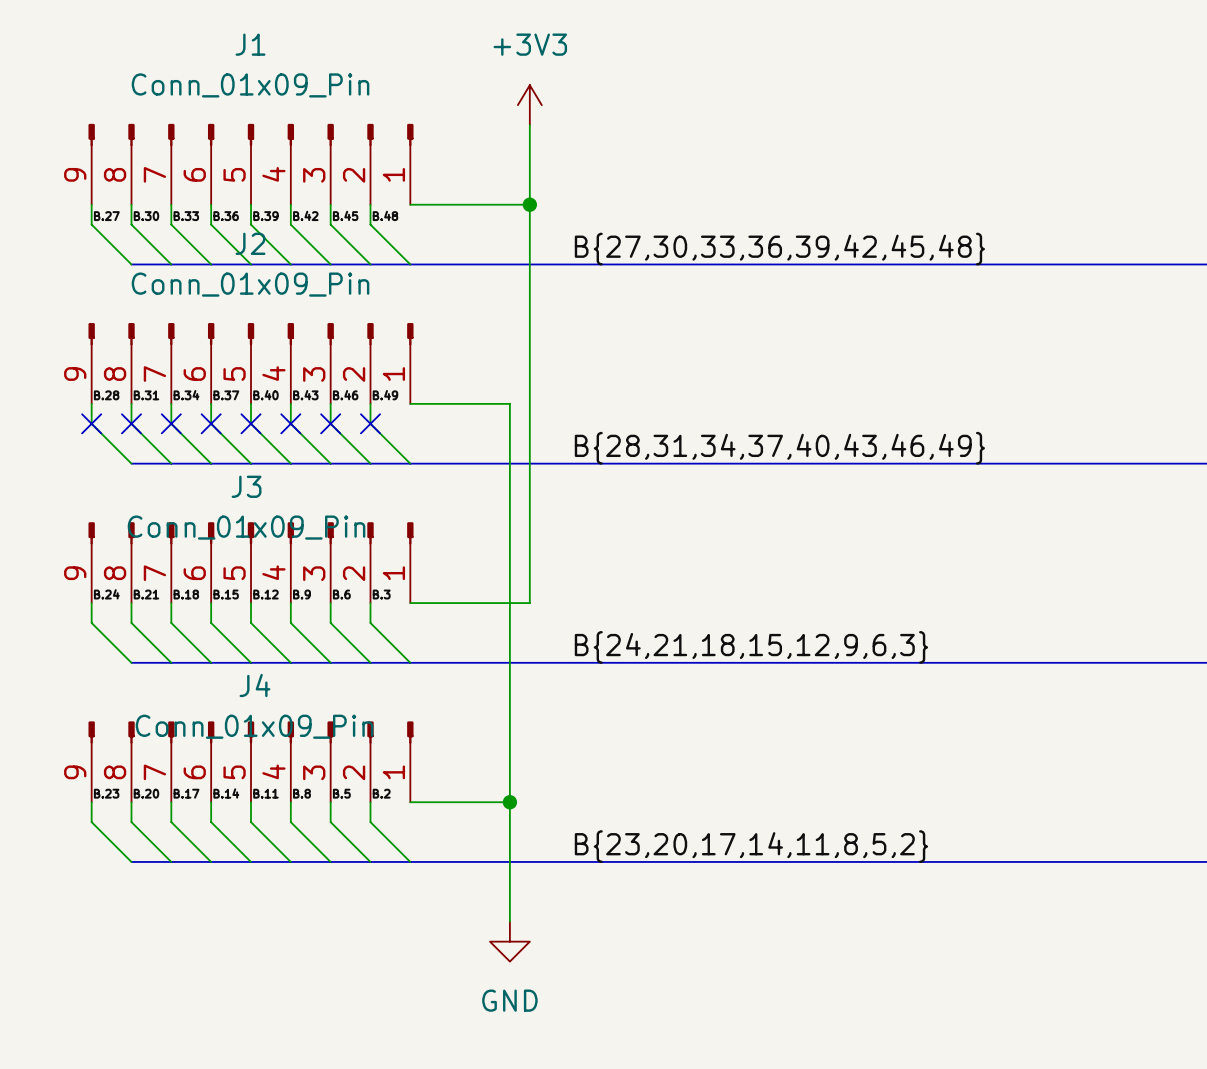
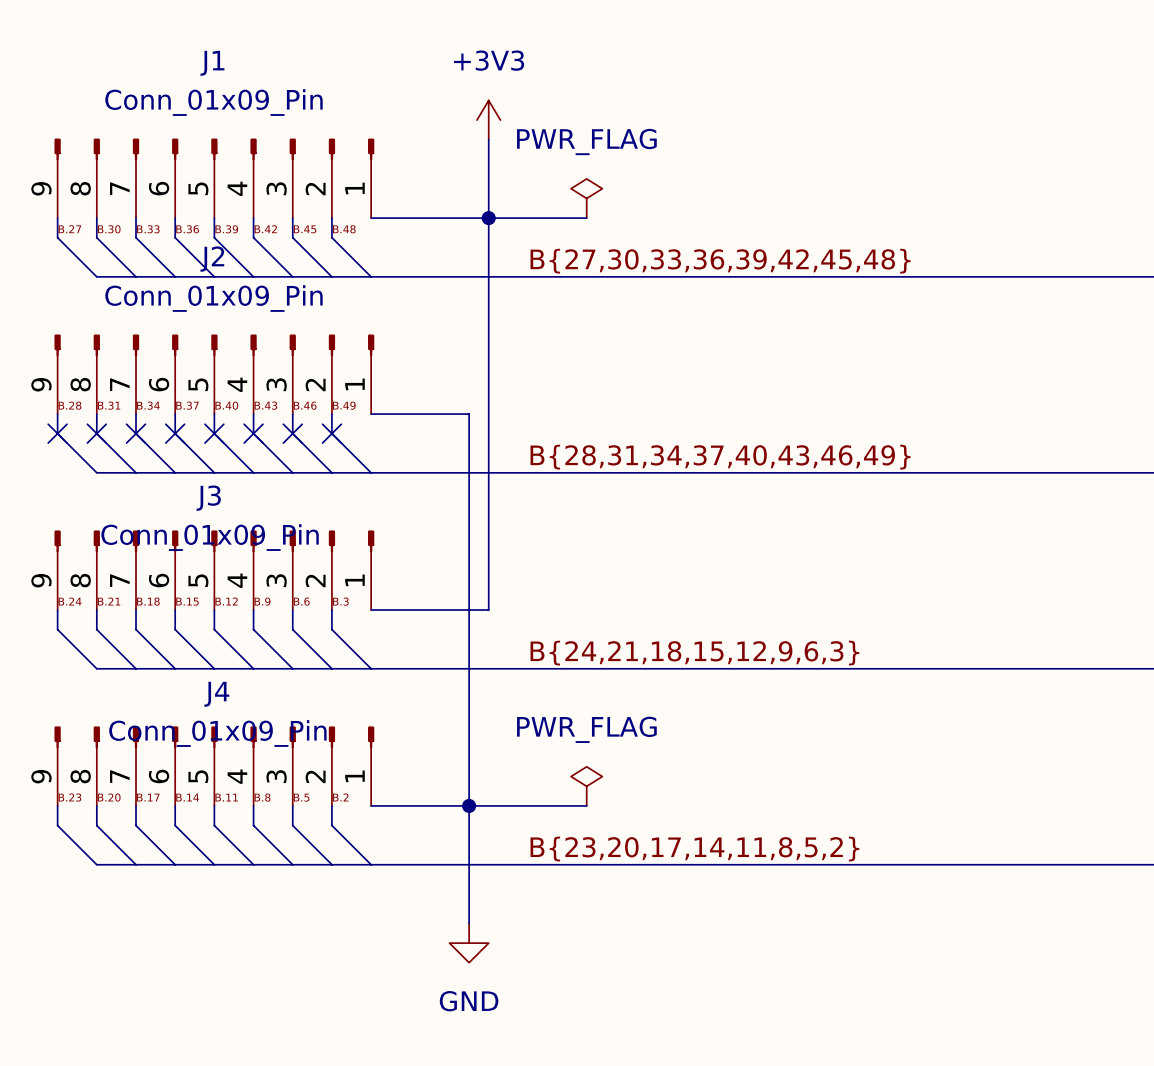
power symbol: none -> PWR_FLAG (586, 198)
wire: none -> (488, 218) (586, 218)
power symbol: none -> PWR_FLAG (586, 786)
wire: none -> (469, 805) (586, 805)

